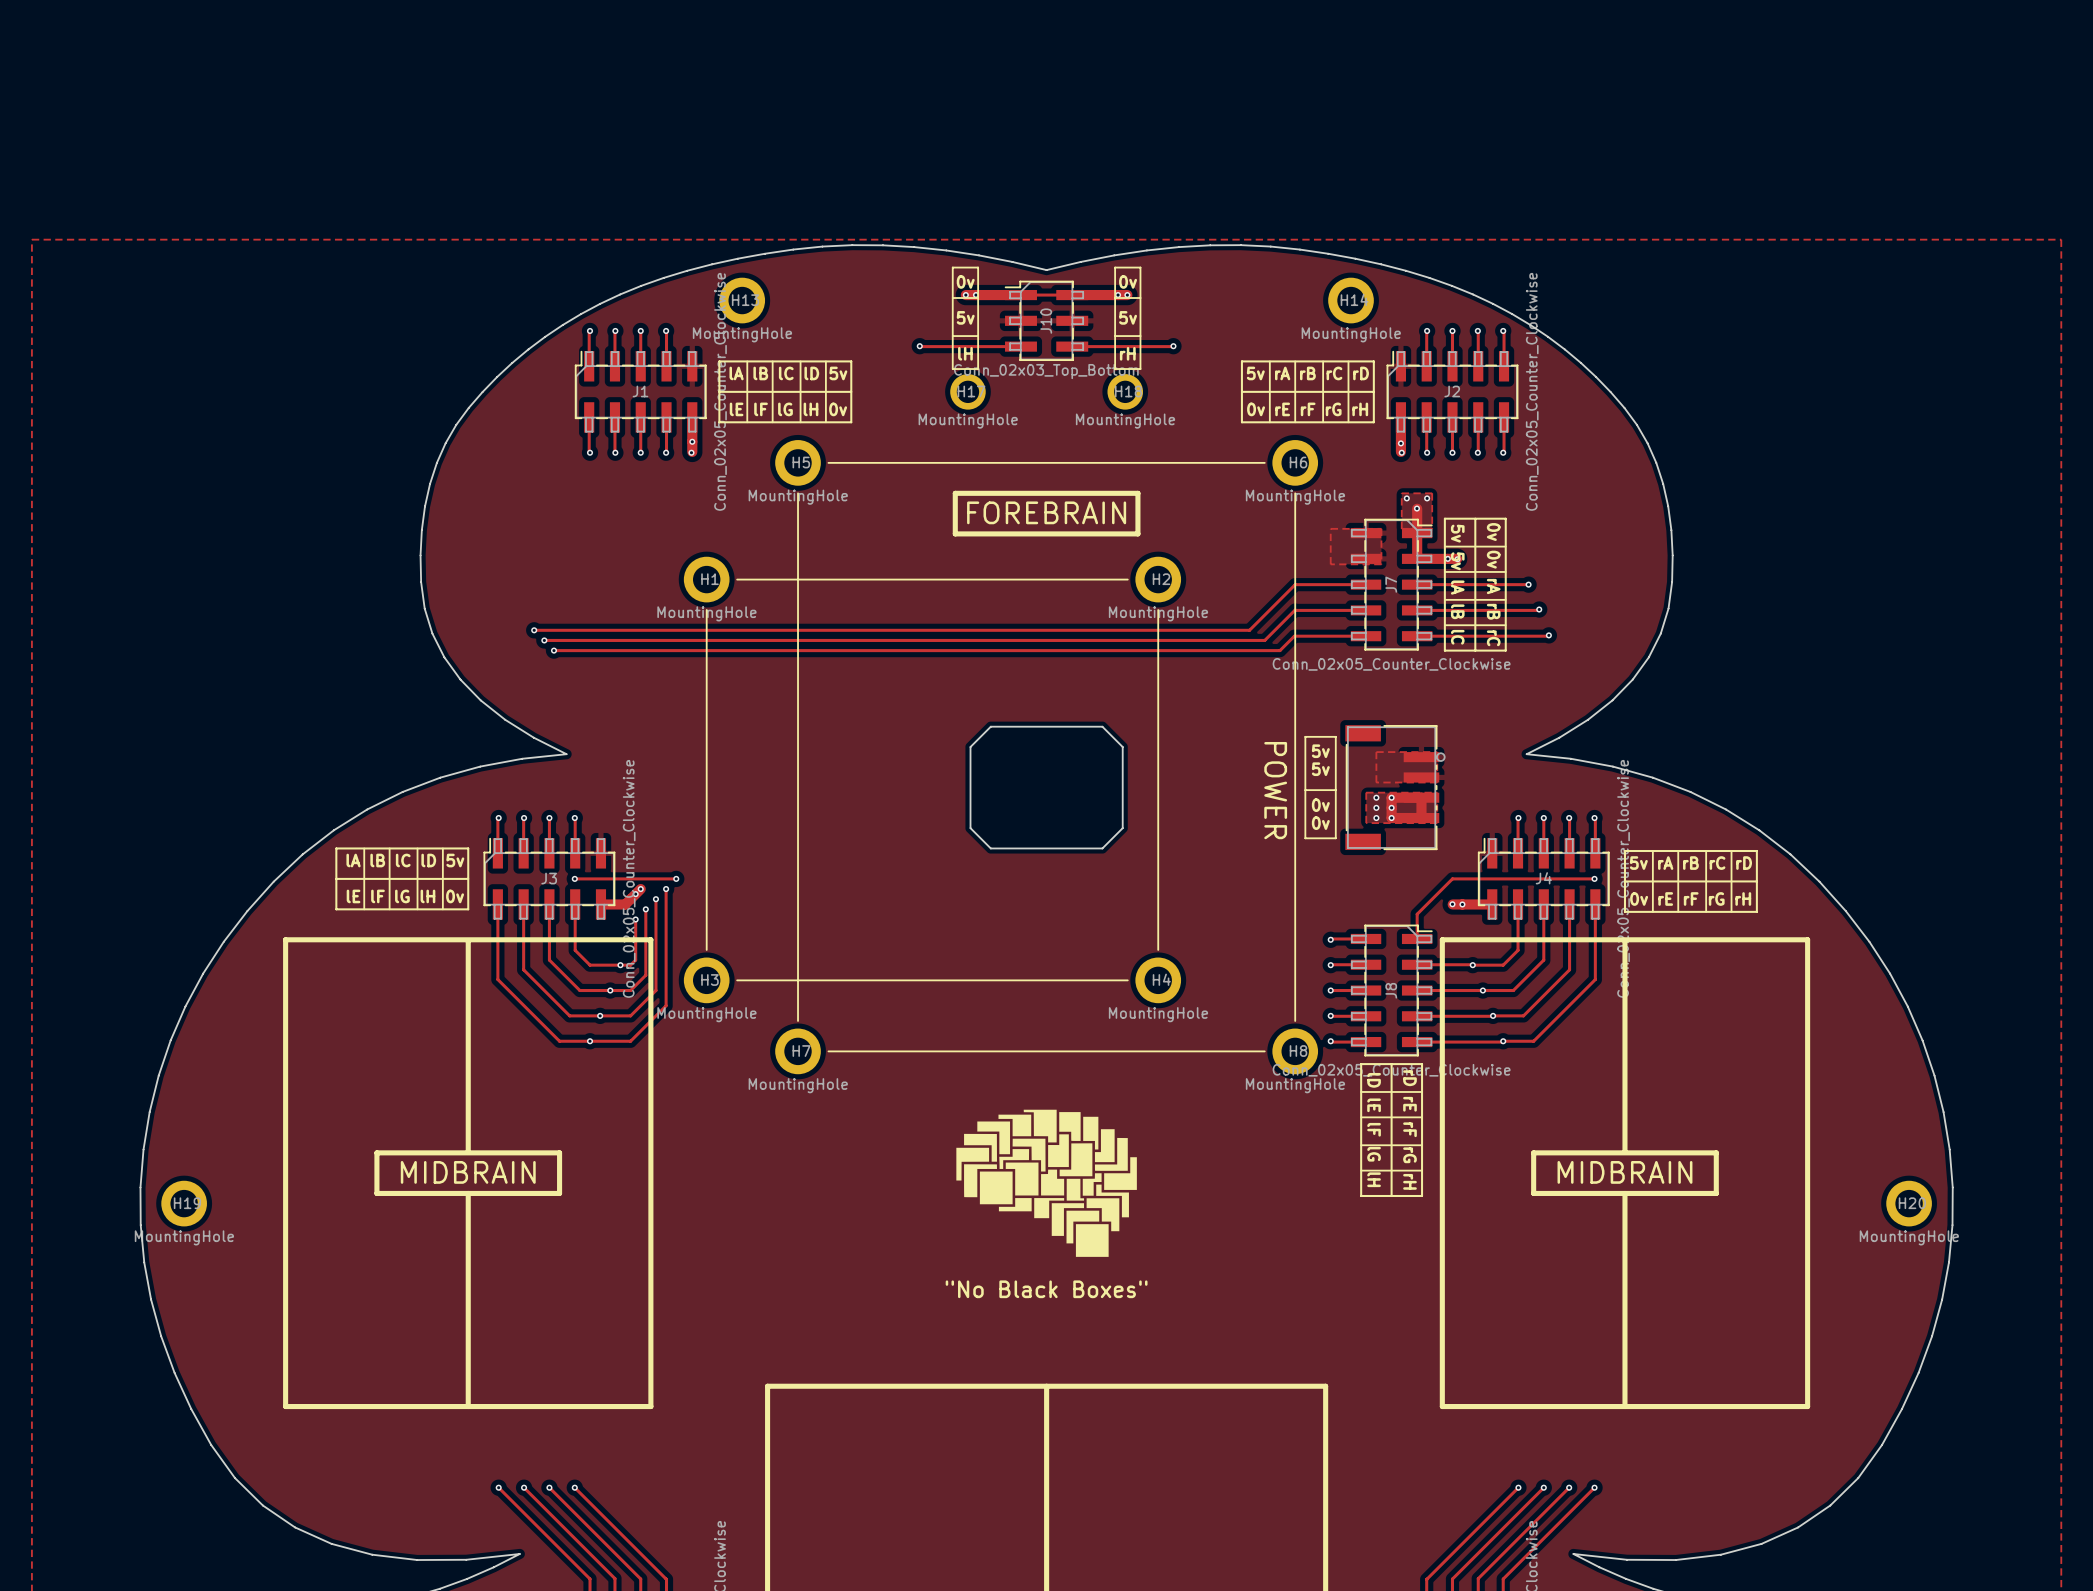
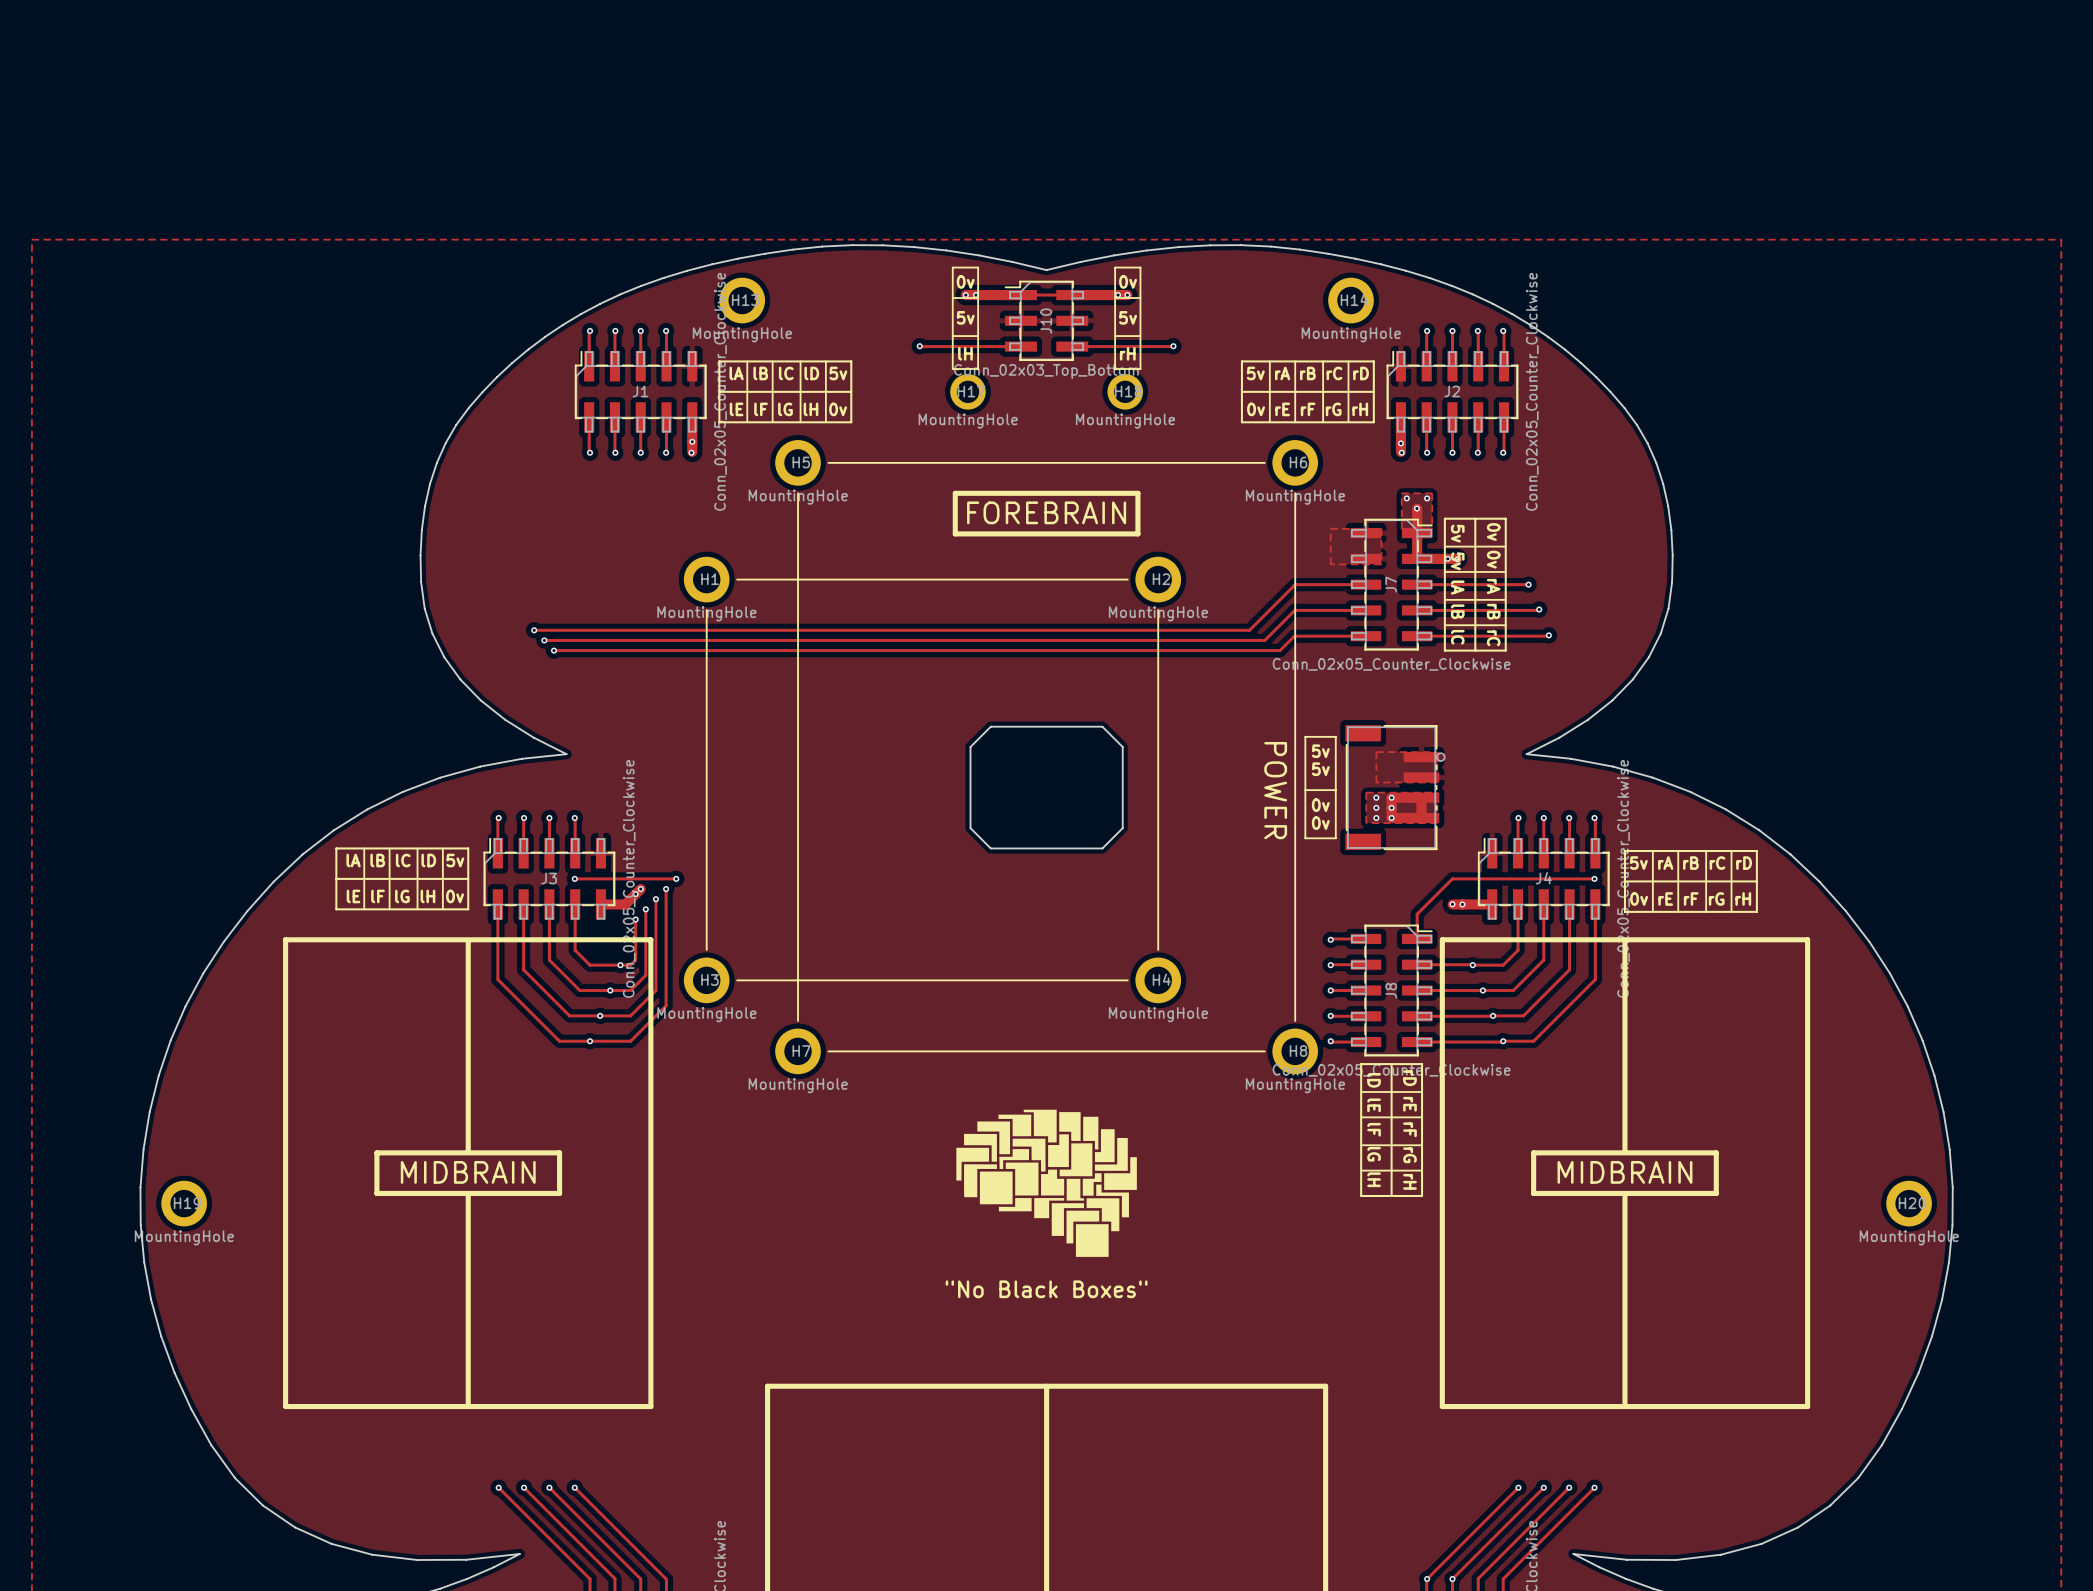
via: none -> (1427, 1579)
via: none -> (1452, 1579)

